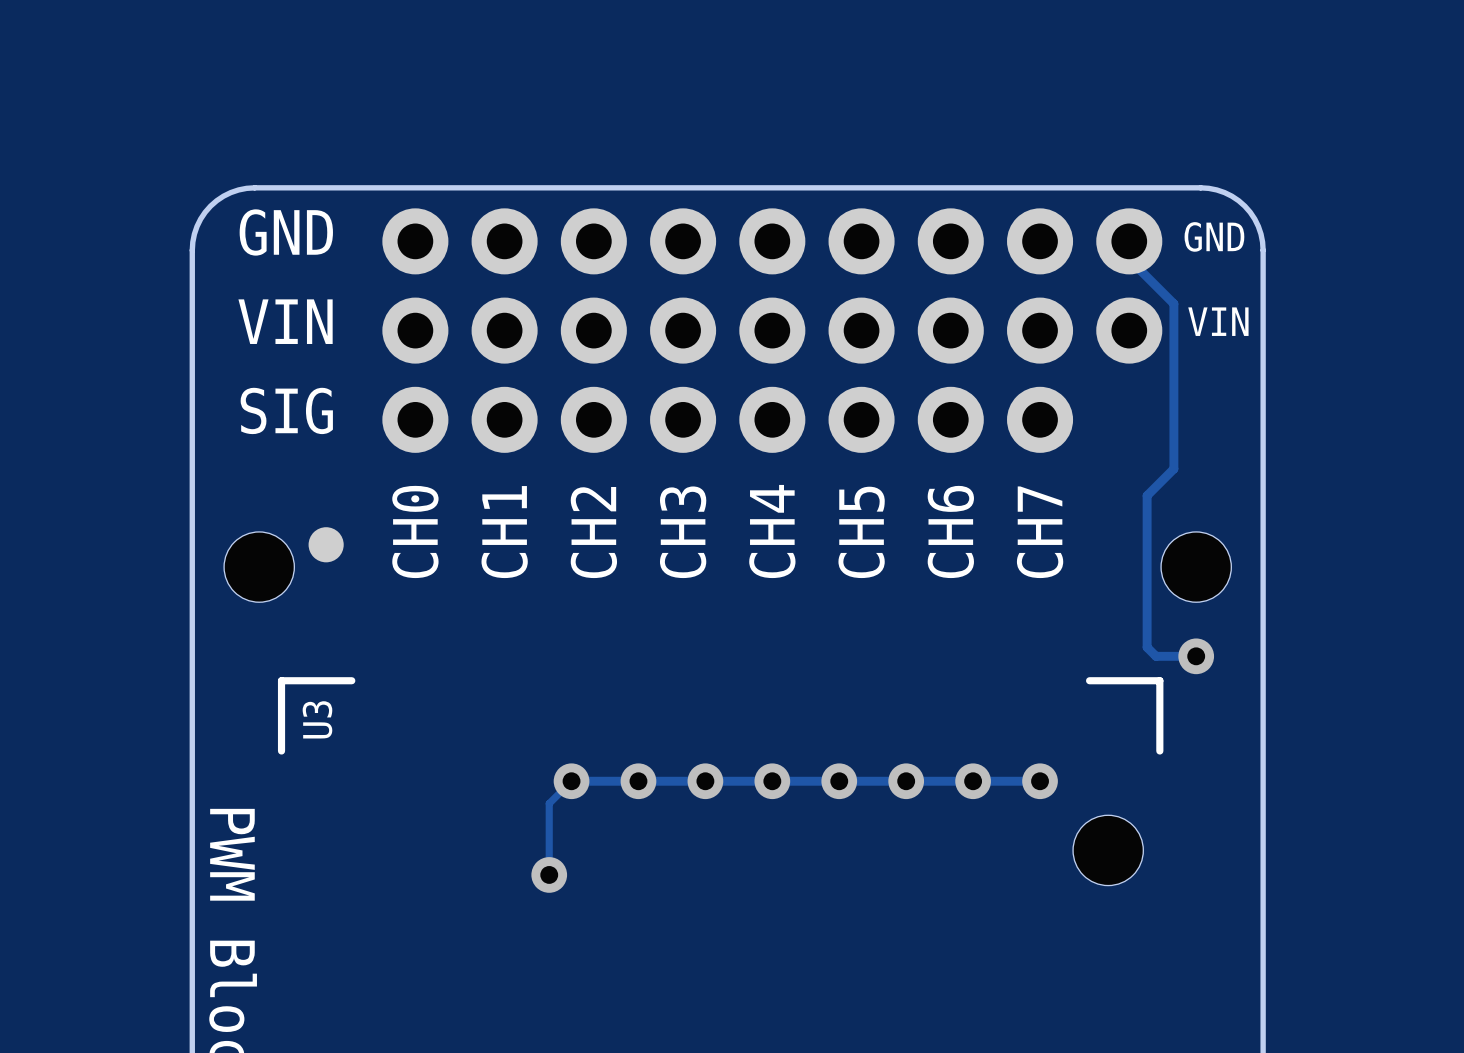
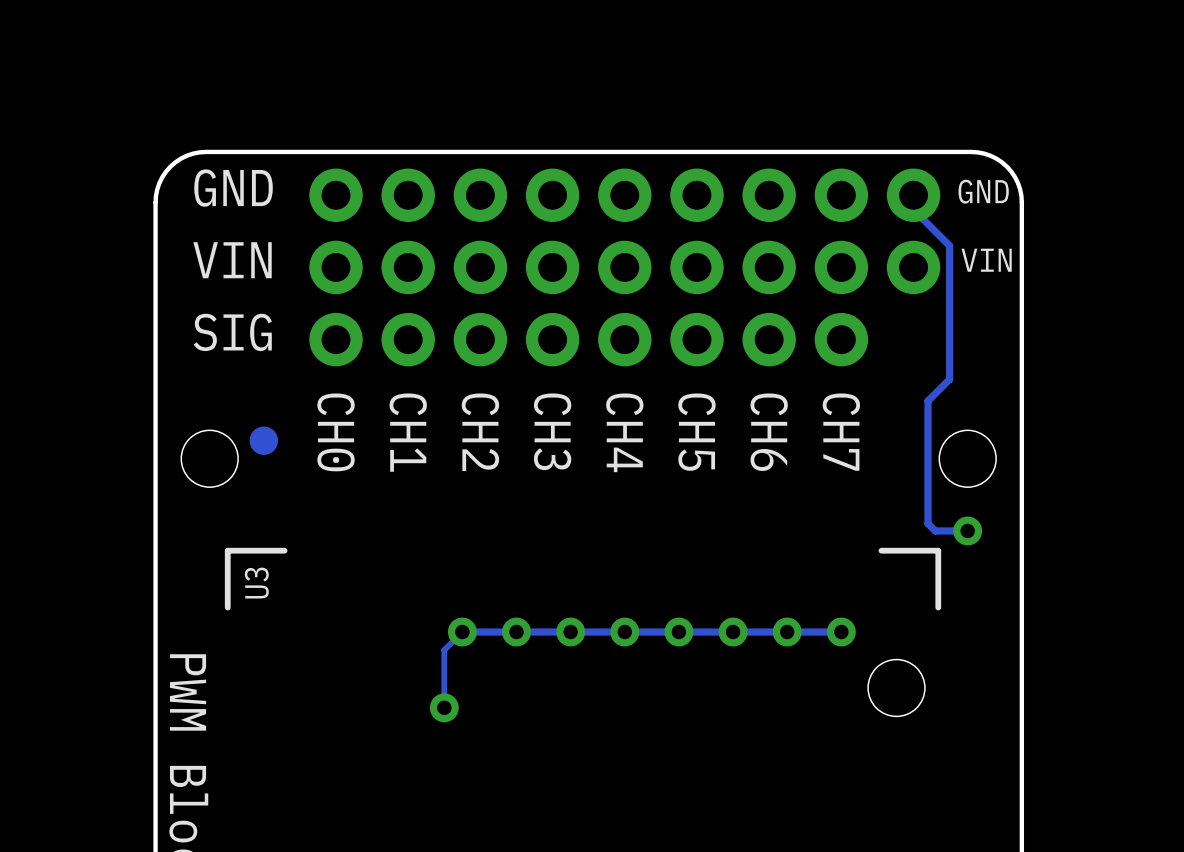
text rotation: 0° (415, 531) -> 180° (336, 432)
text rotation: 0° (772, 531) -> 180° (624, 432)
text rotation: 0° (950, 531) -> 180° (769, 432)
text rotation: 0° (504, 532) -> 180° (408, 432)
text rotation: 0° (593, 532) -> 180° (480, 432)
text rotation: 0° (683, 532) -> 180° (552, 431)
text rotation: 0° (861, 532) -> 180° (696, 432)
text rotation: 0° (1040, 532) -> 180° (841, 432)

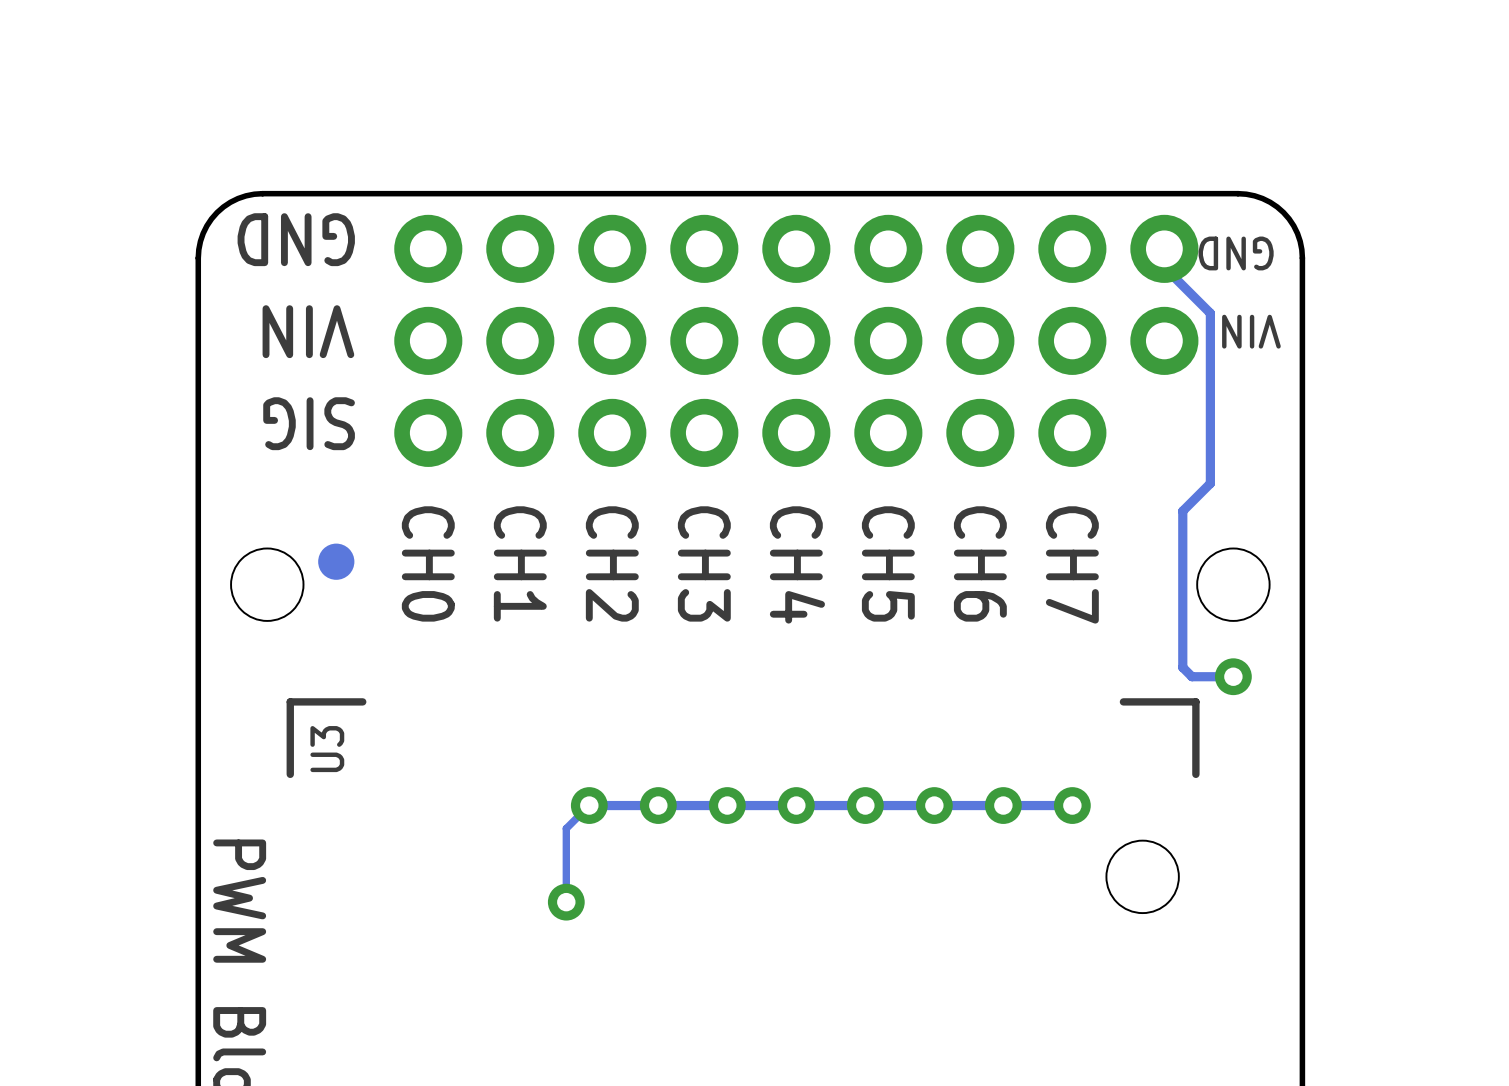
text rotation: 0° (233, 188) -> 180° (296, 239)
text rotation: 0° (983, 191) -> 180° (1236, 253)
text rotation: 0° (232, 260) -> 180° (308, 331)
text rotation: 0° (986, 260) -> 180° (1251, 331)
text rotation: 0° (232, 332) -> 180° (309, 423)

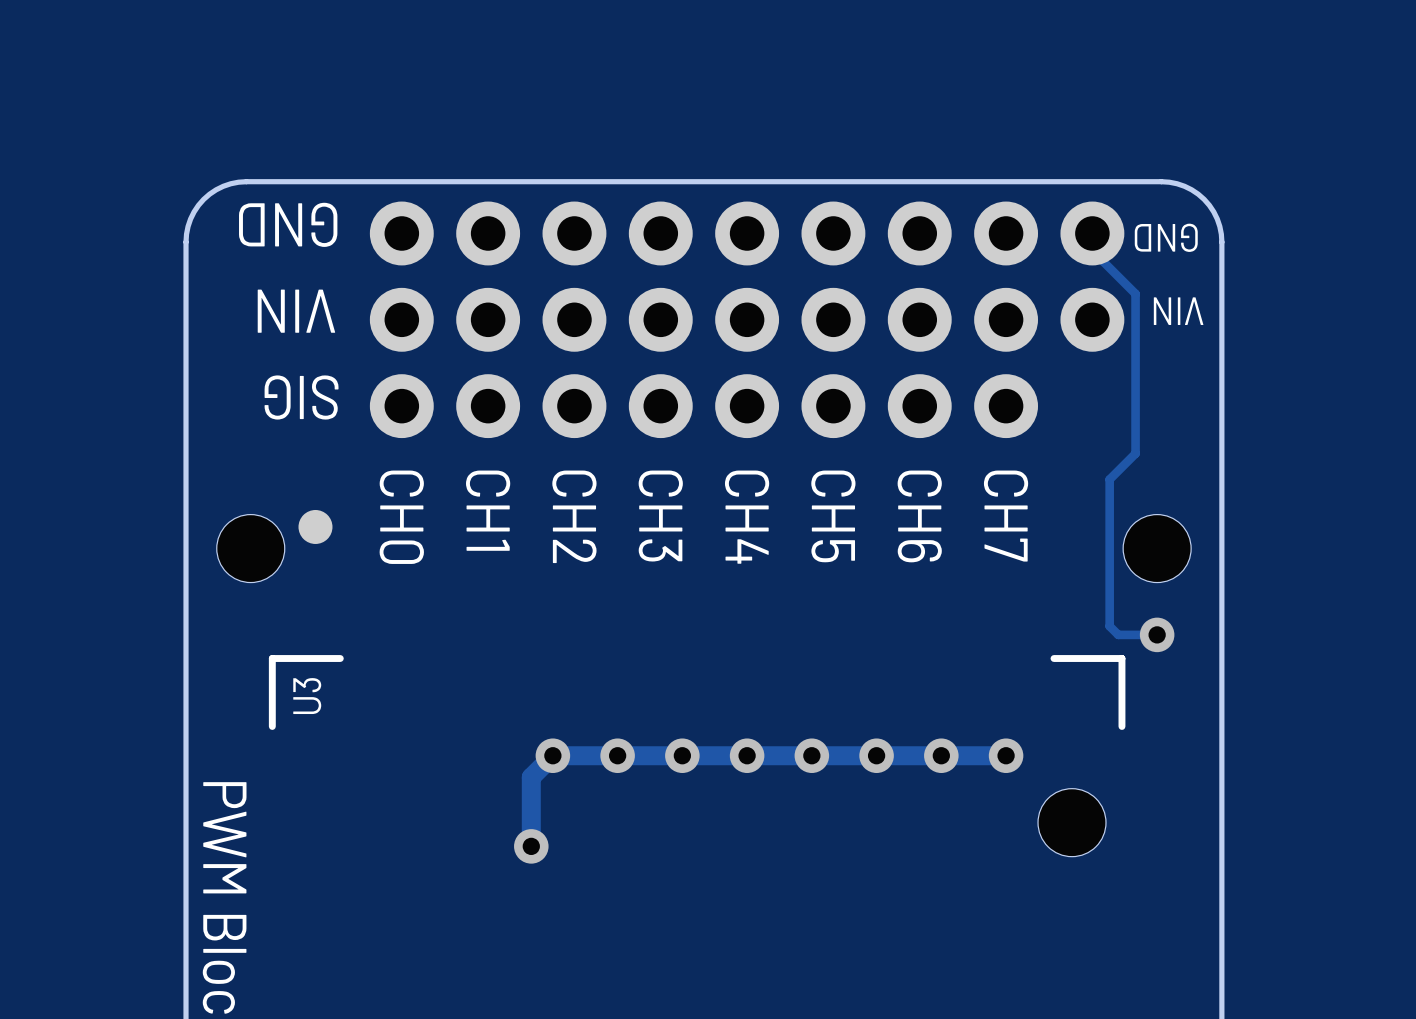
track width: thin (1072, 805) (589, 805) (566, 828) (566, 902) -> thick (1006, 755) (552, 755) (531, 777) (531, 846)

